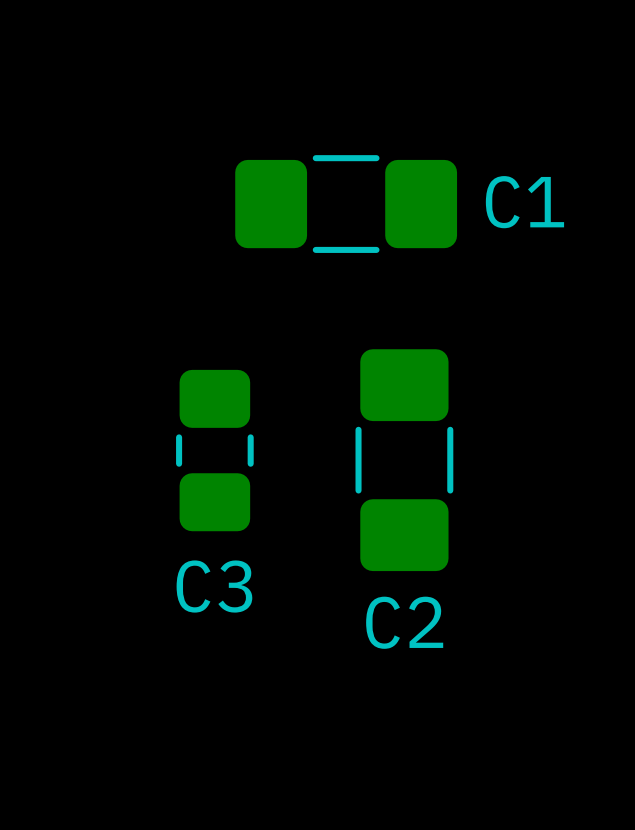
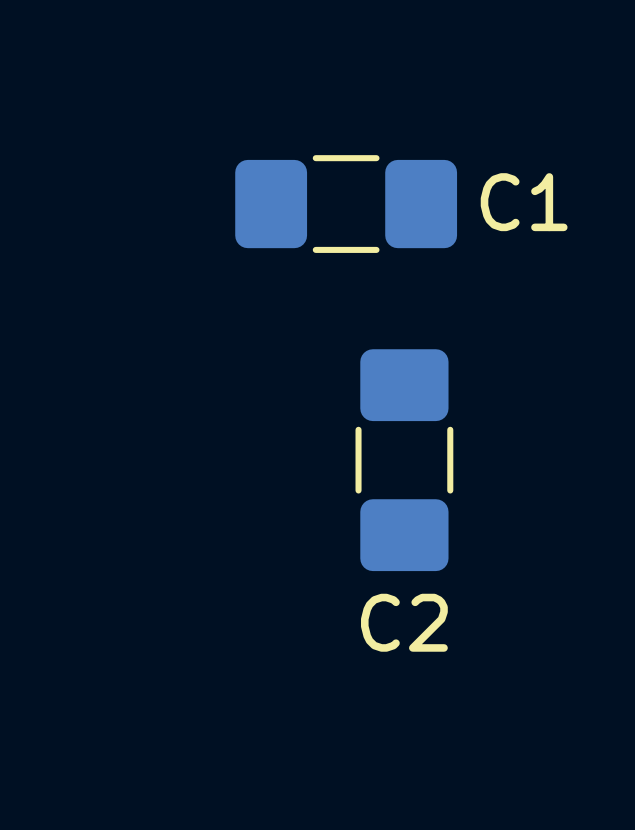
C3: (214, 450) -> none

